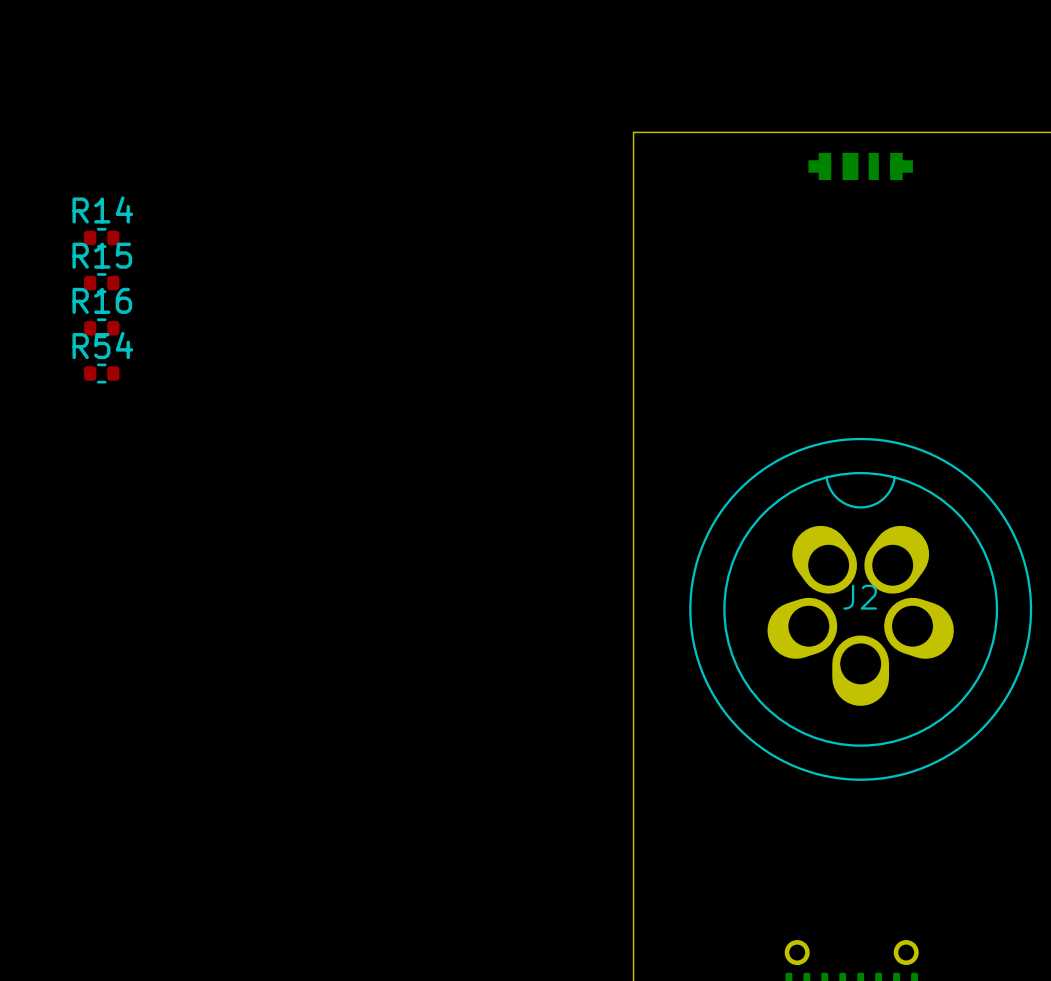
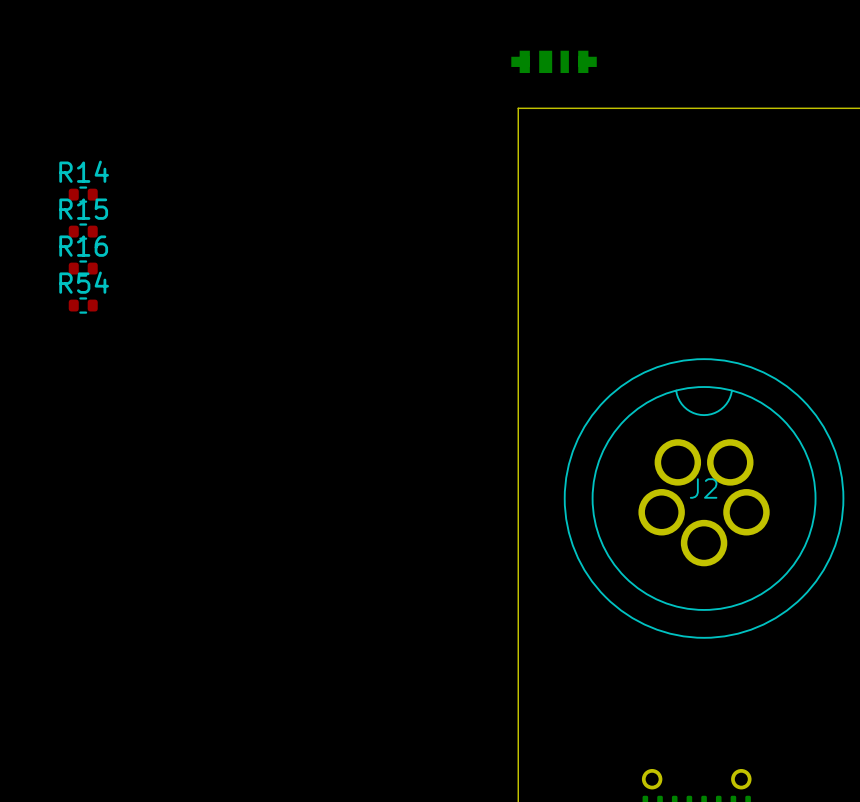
part position: (860, 166) -> (554, 61)
J2 footprint: [689, 437, 1033, 781] -> [563, 358, 845, 639]

